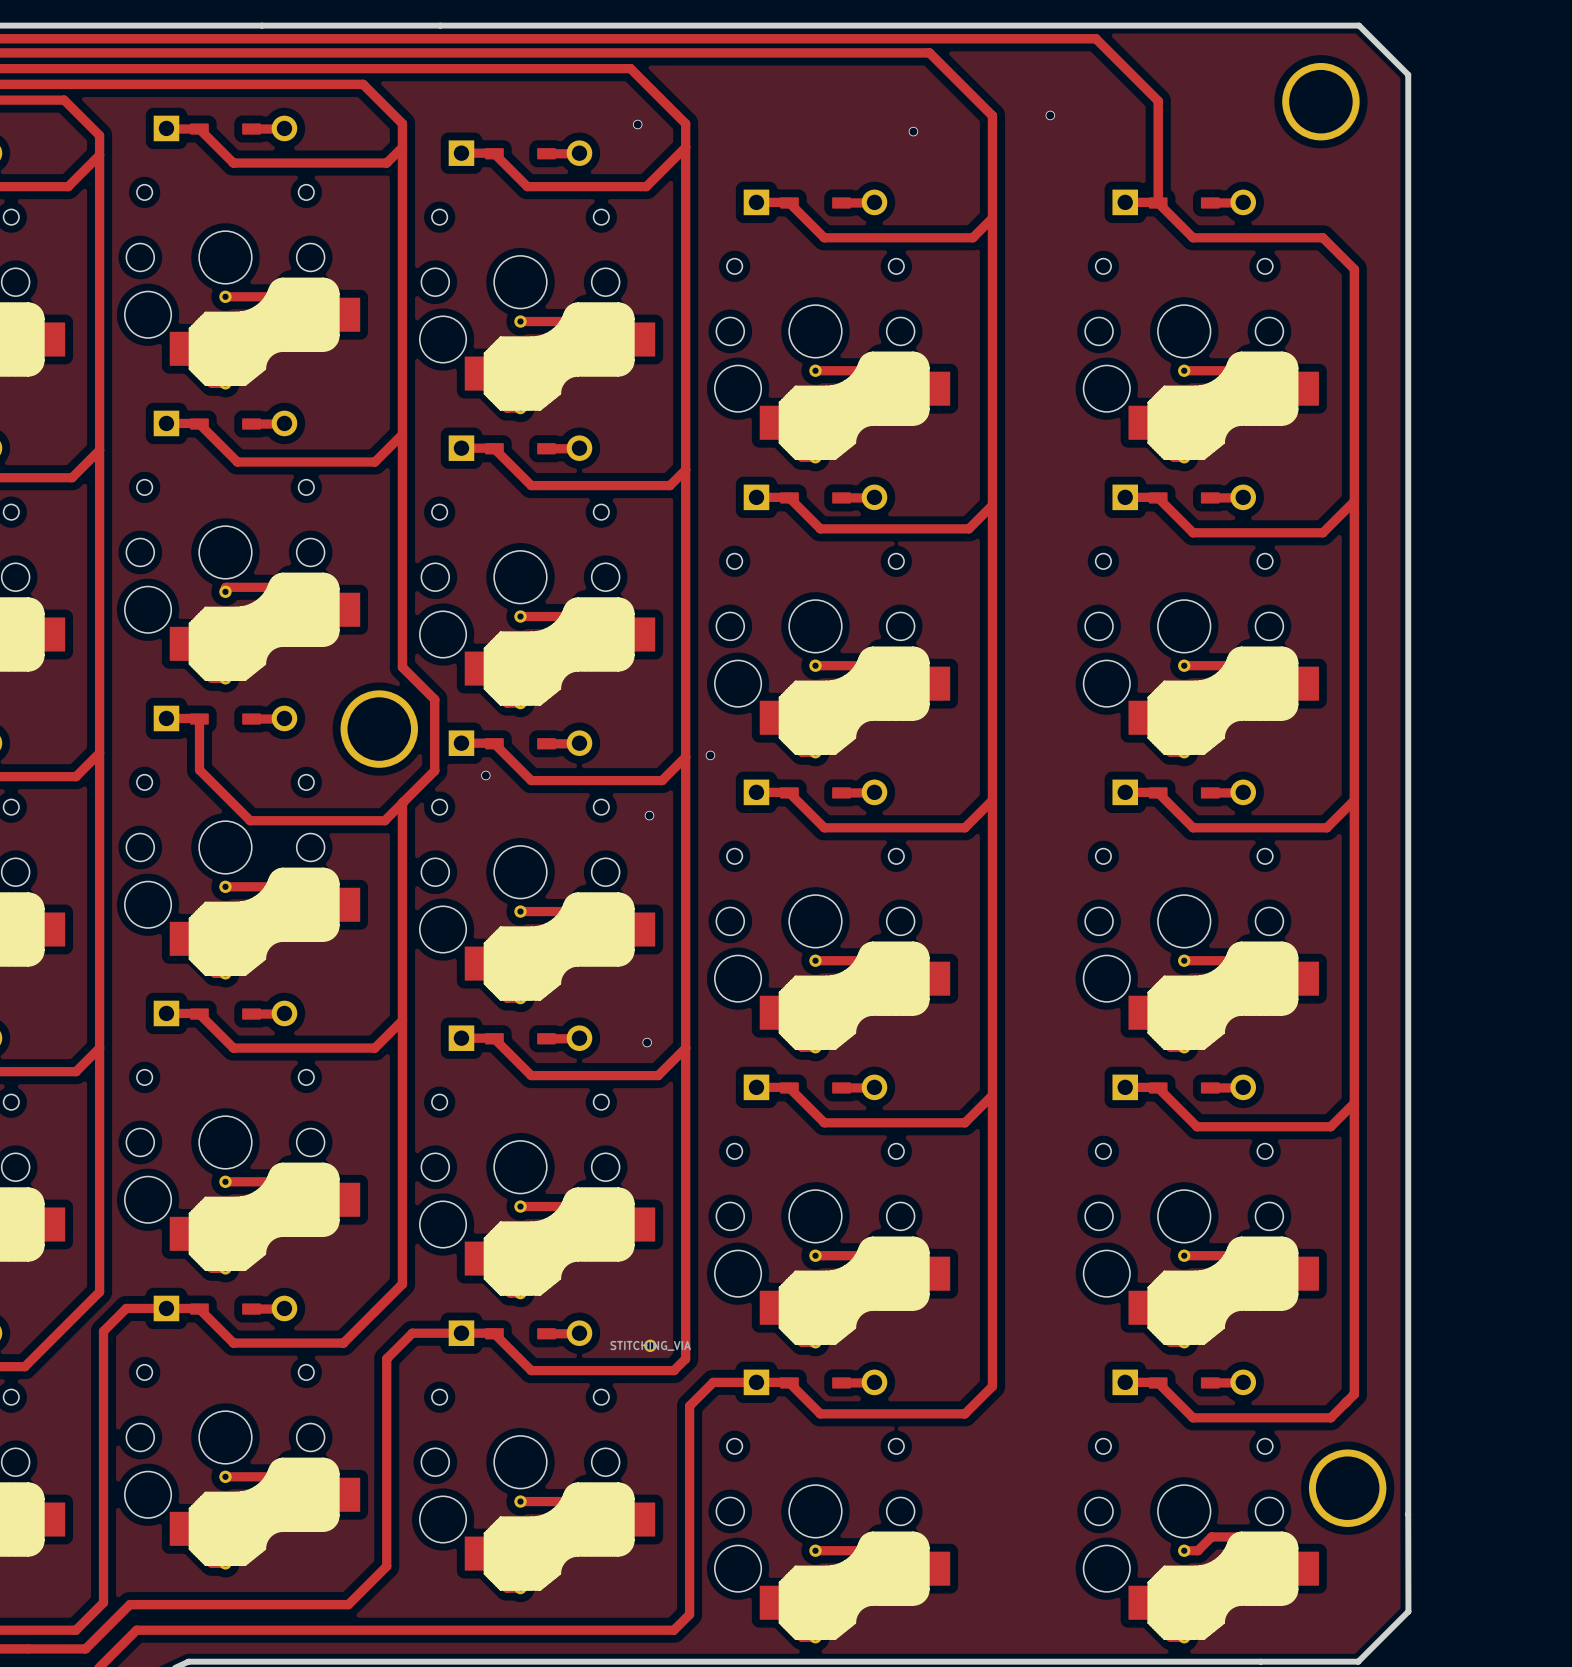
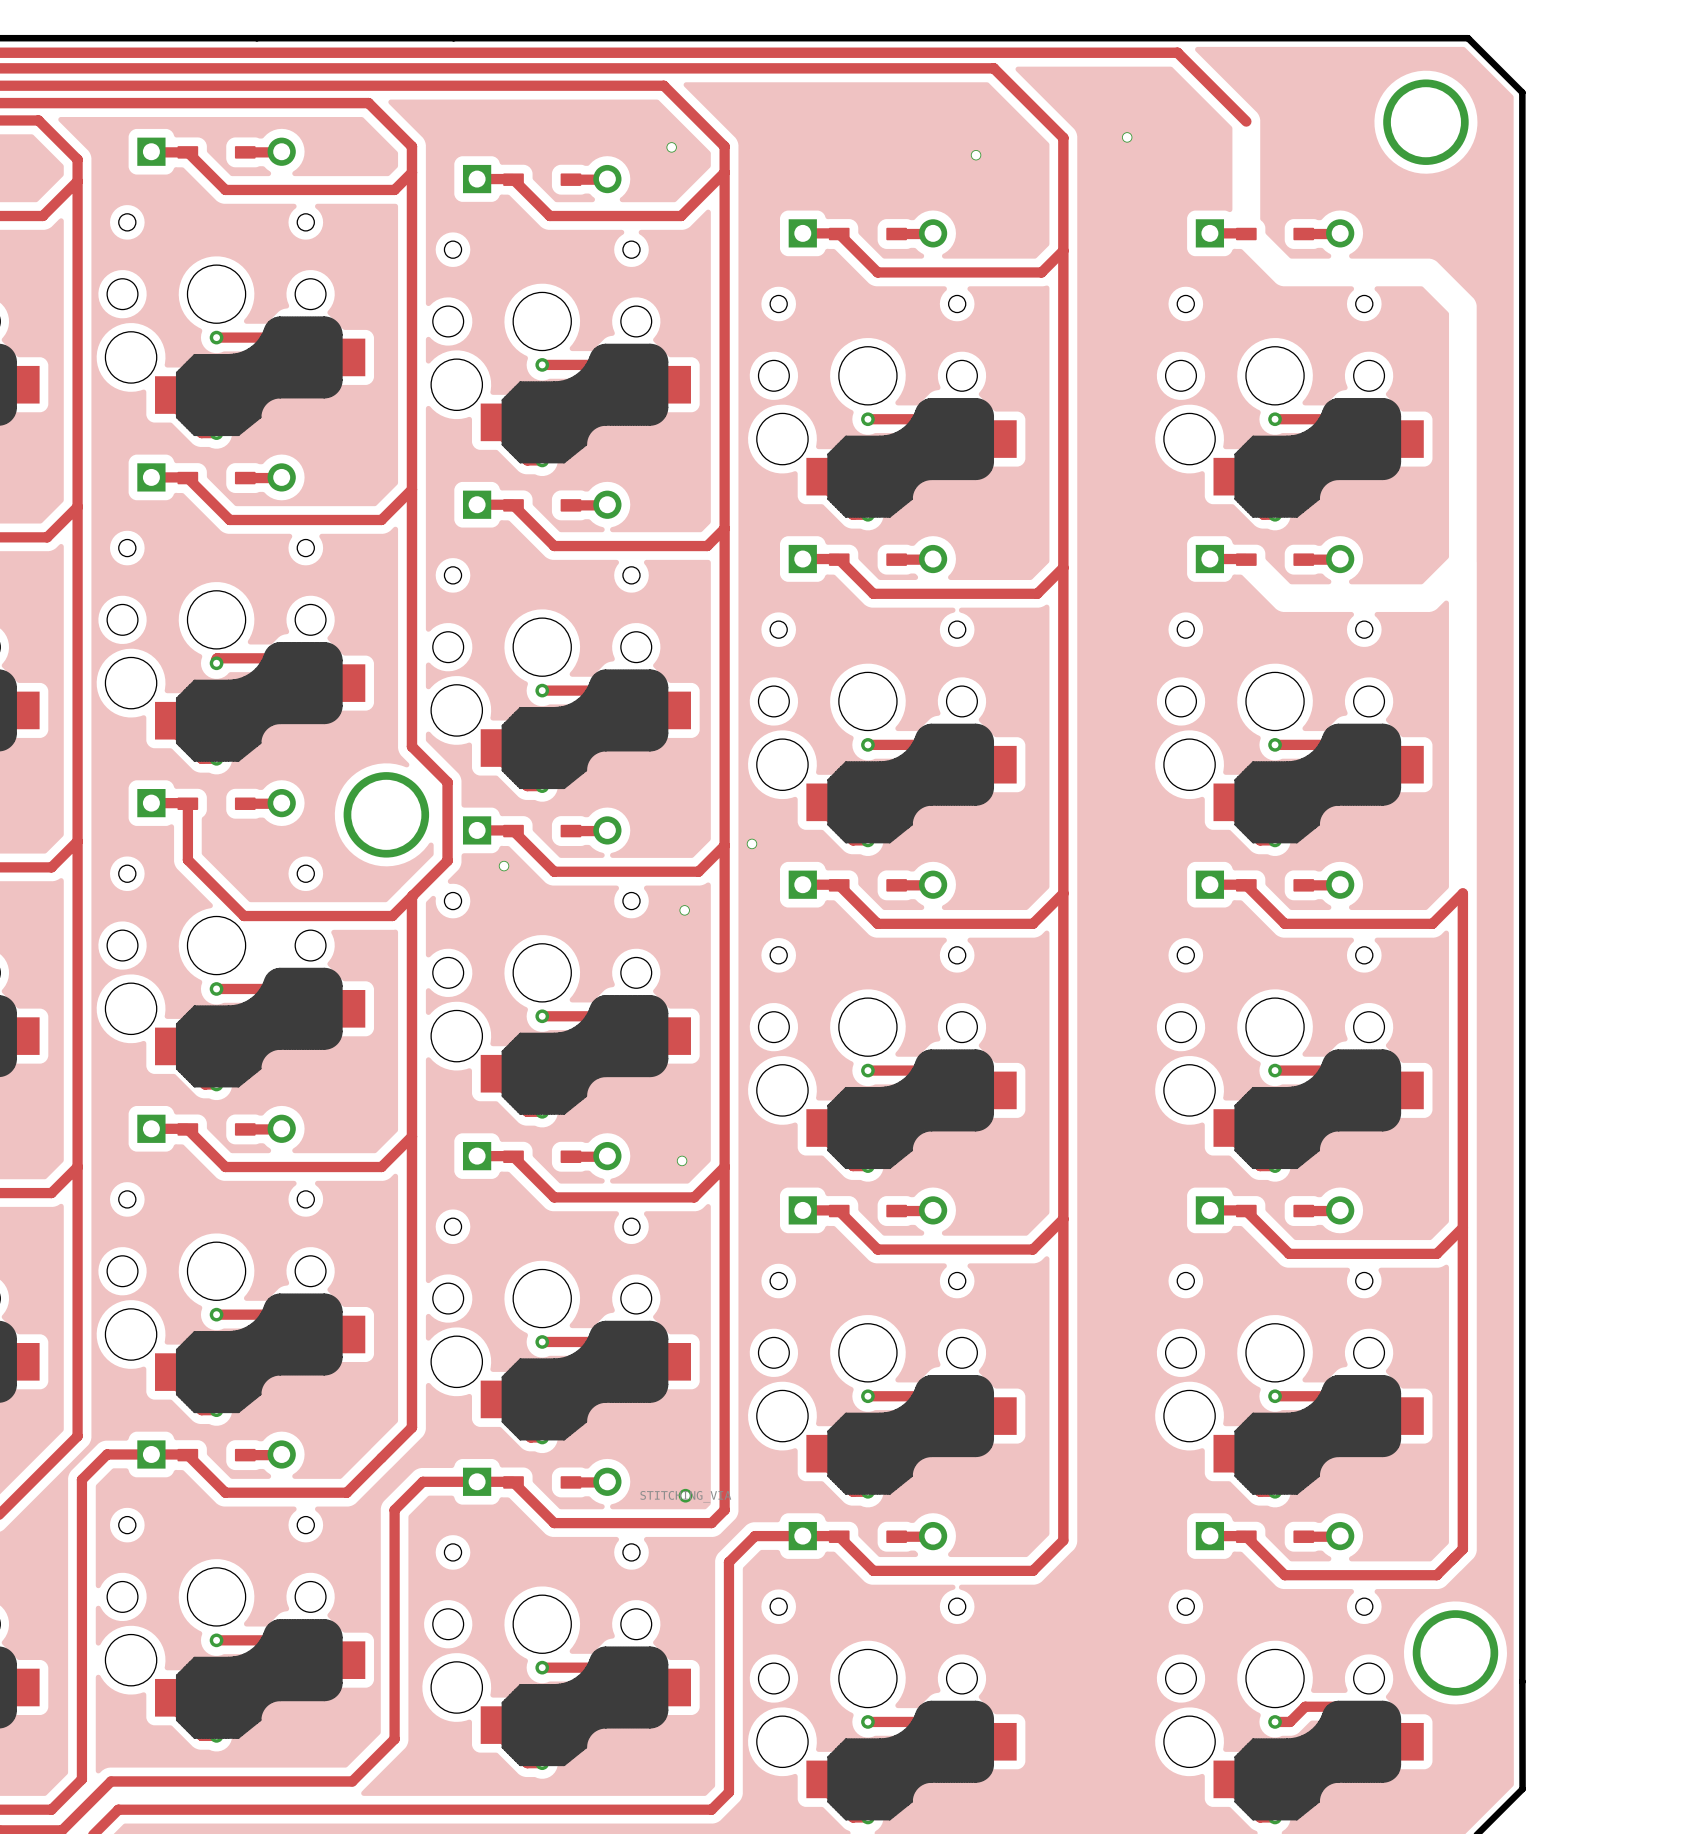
track: (1158, 101) (1158, 202) (1193, 237) (1322, 237) (1354, 269) (1354, 501) -> none
track: (1158, 497) (1193, 532) (1322, 532) (1354, 501) -> none
track: (1354, 501) (1354, 800) -> none

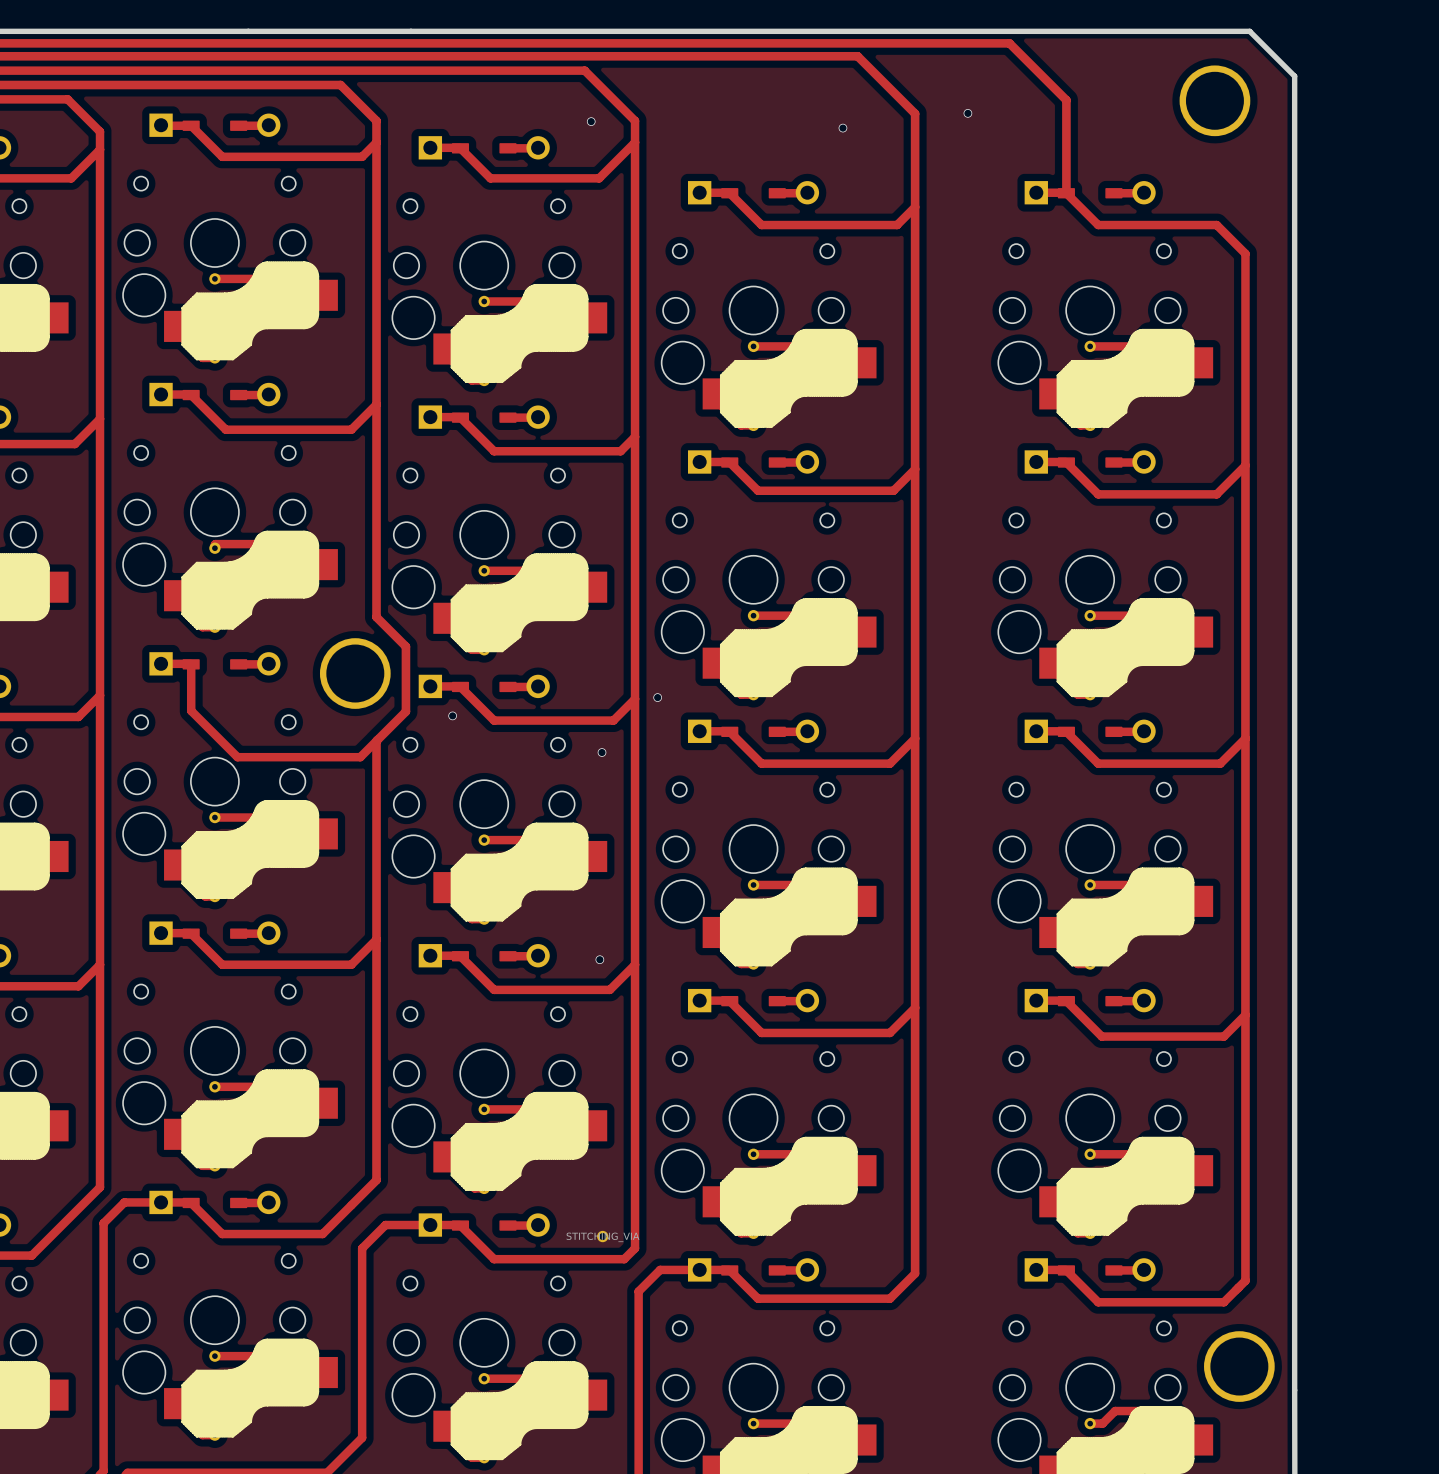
track: none -> (1066, 100) (1066, 193) (1098, 225) (1216, 225) (1245, 253) (1245, 465)
track: none -> (1066, 462) (1098, 494) (1216, 494) (1245, 465)
track: none -> (1245, 465) (1245, 738)

